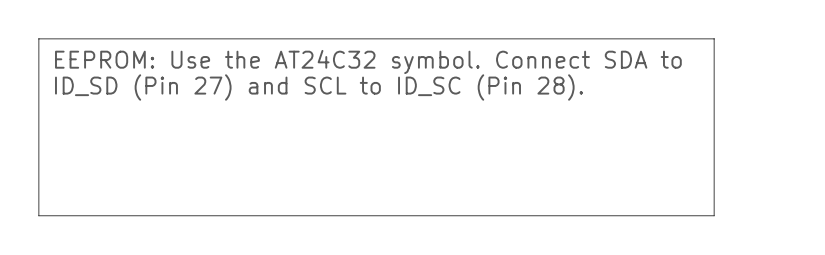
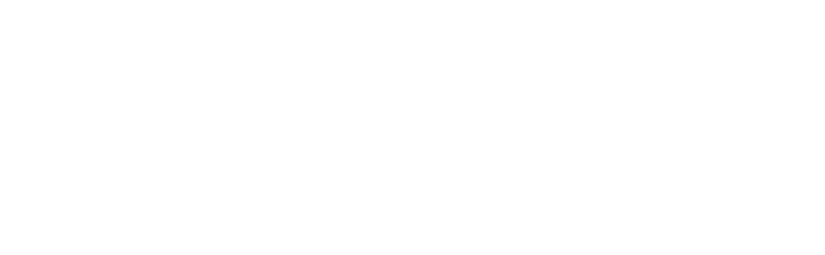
line: (38, 38) (714, 38) (714, 215) (38, 215) (38, 38) -> none
text: EEPROM: Use the AT24C32 symbol. Connect SDA to (368, 61) -> none
text: ID_SD (Pin 27) and SCL to ID_SC (Pin 28). (319, 87) -> none

